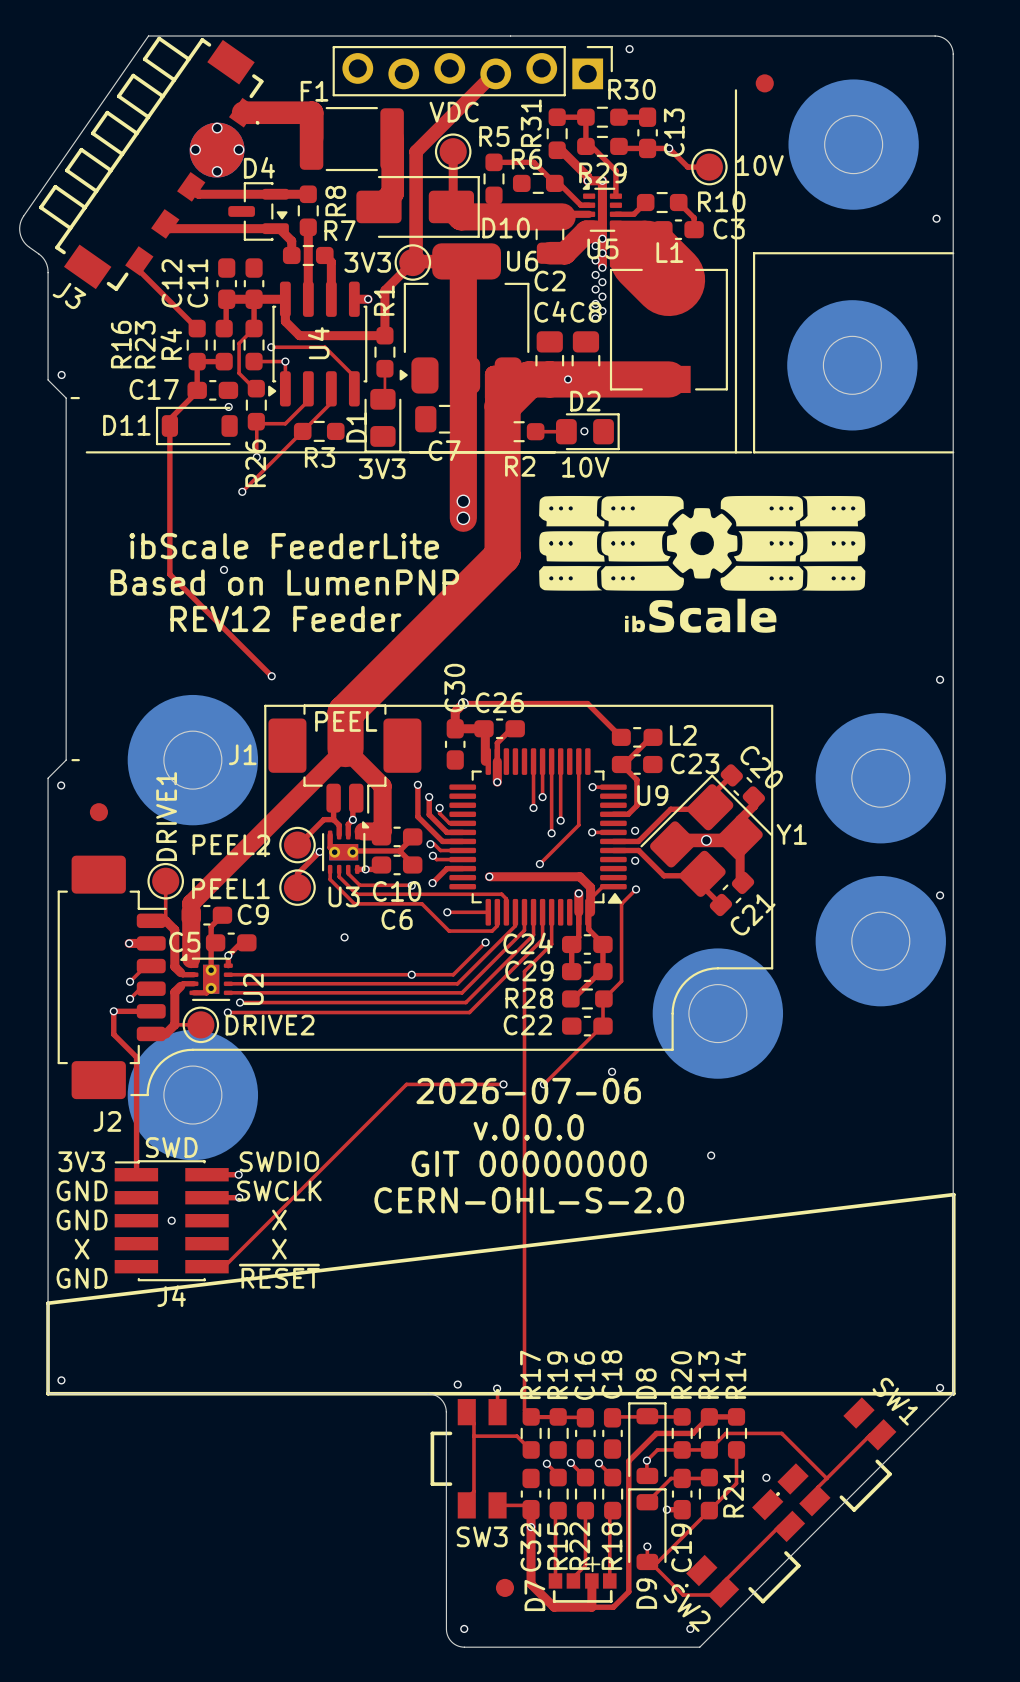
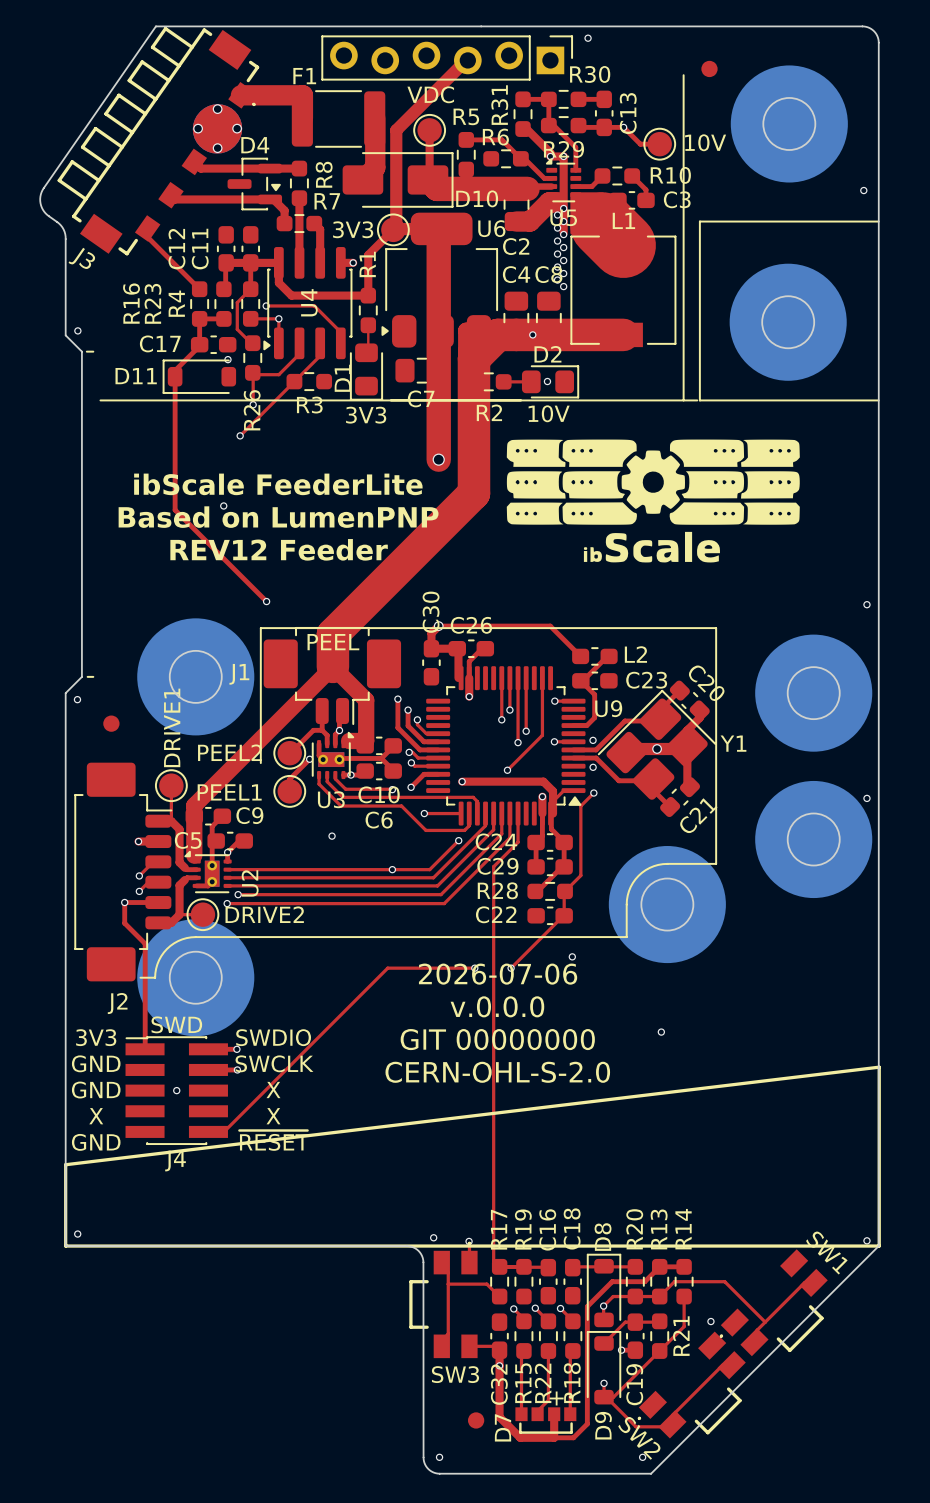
via: none -> (563, 286)
via: (463, 501) -> none

